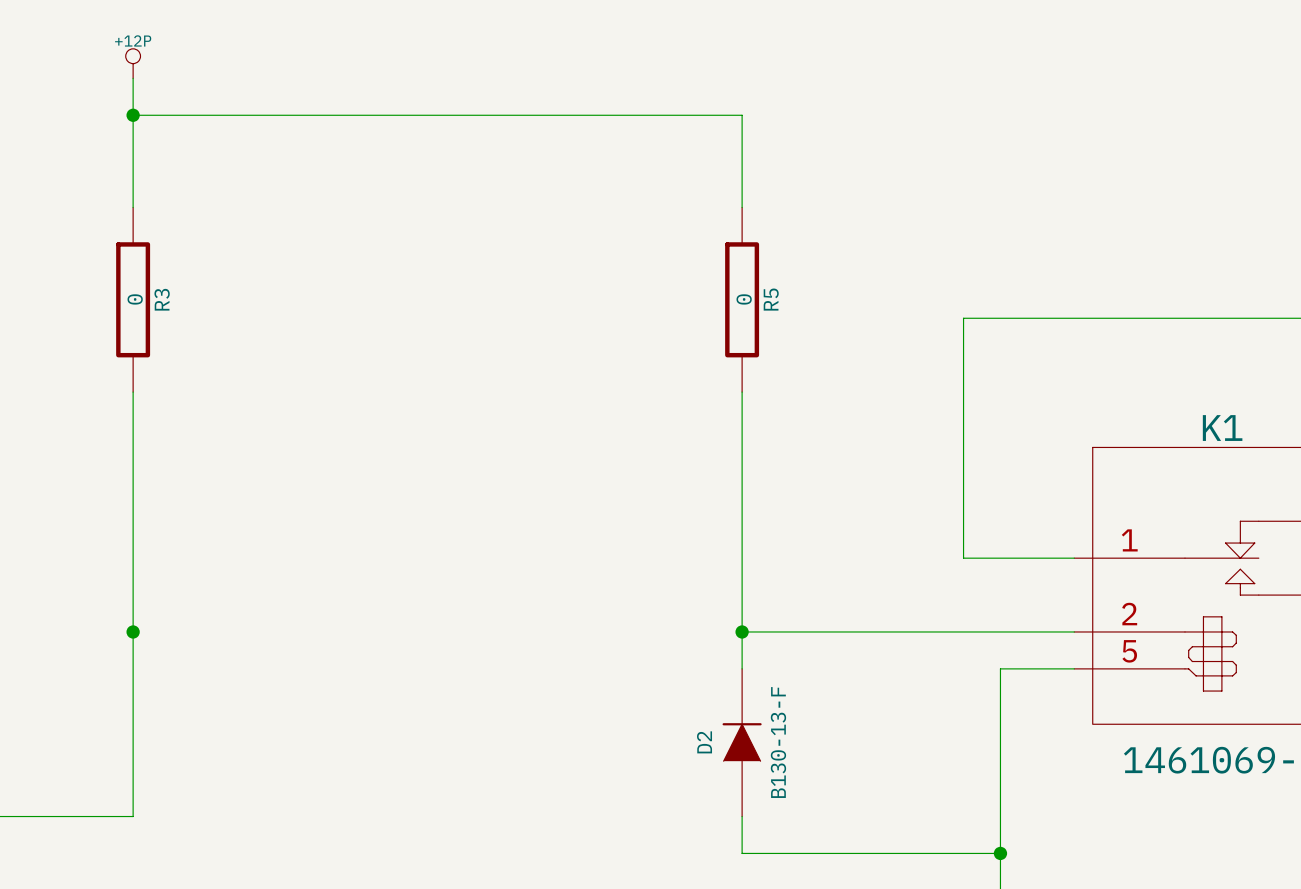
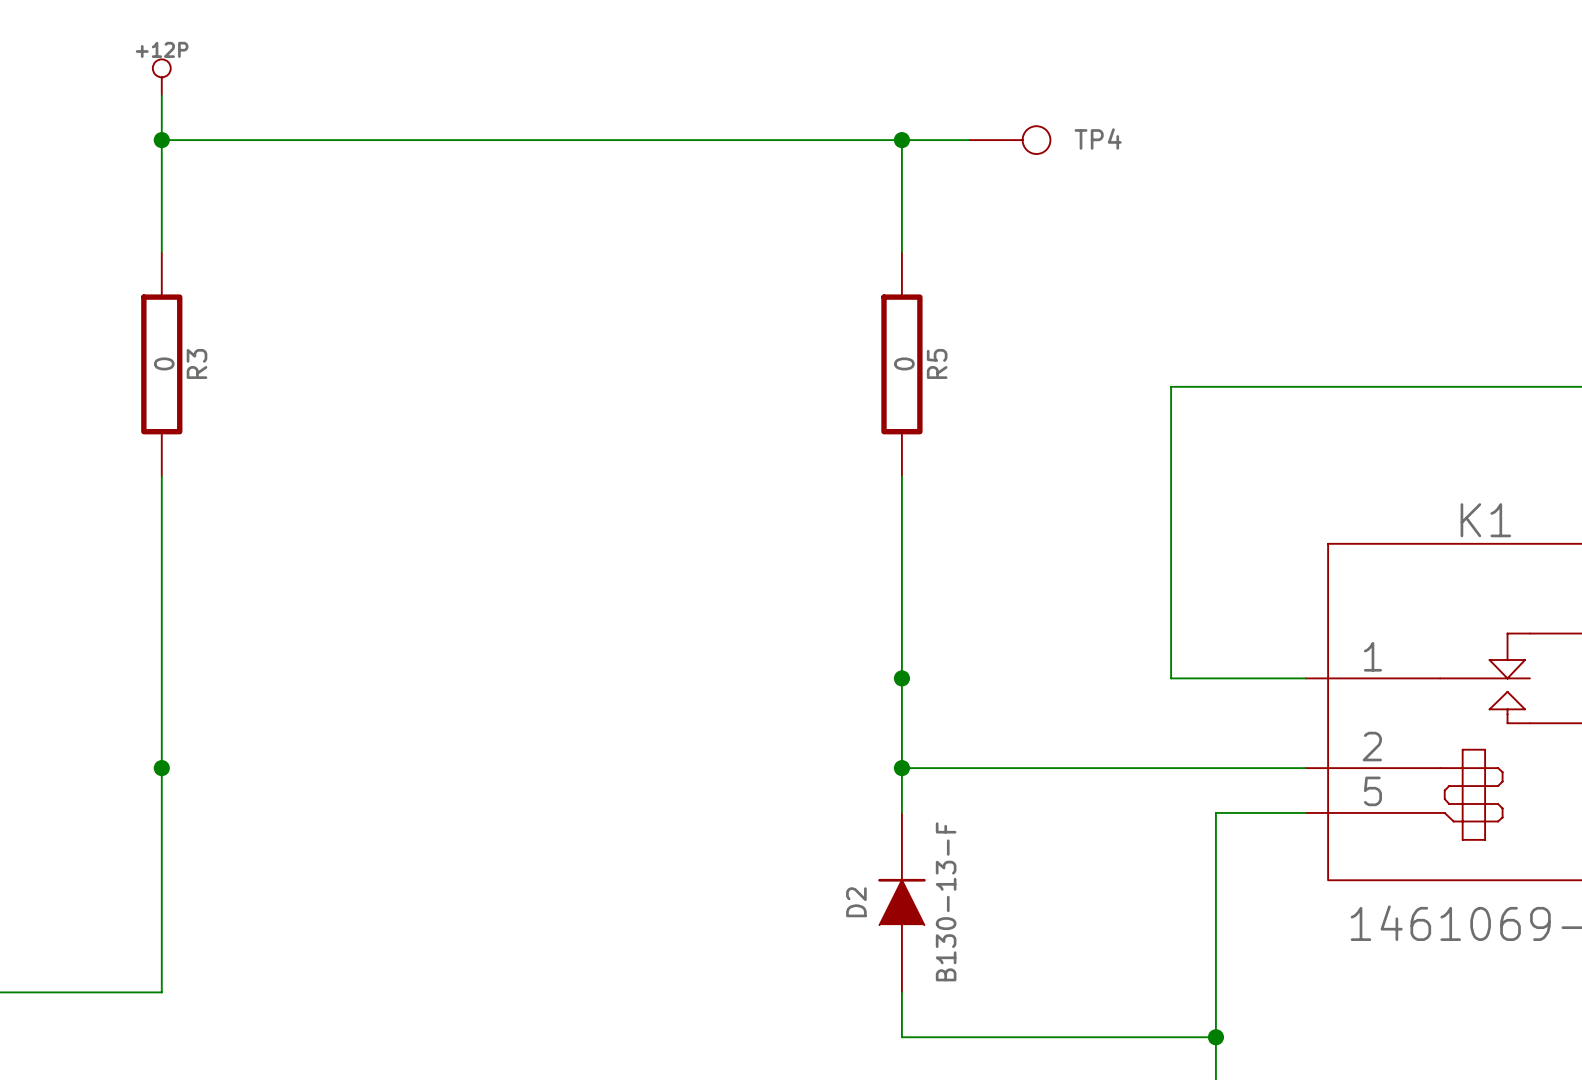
wire: none -> (901, 140) (969, 140)
junction: none -> (901, 140)
TP4: none -> (1009, 140)
junction: none -> (901, 678)

